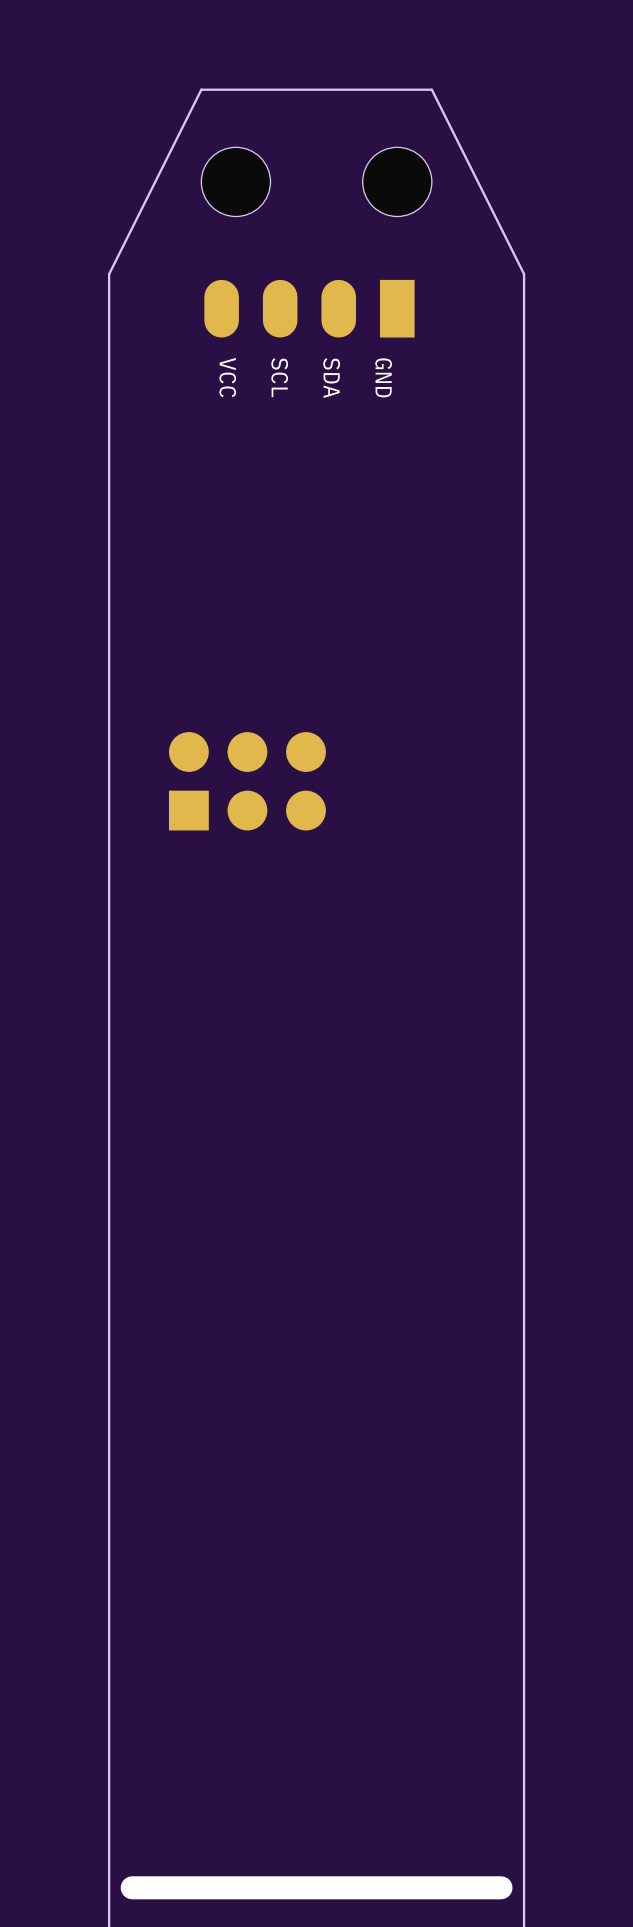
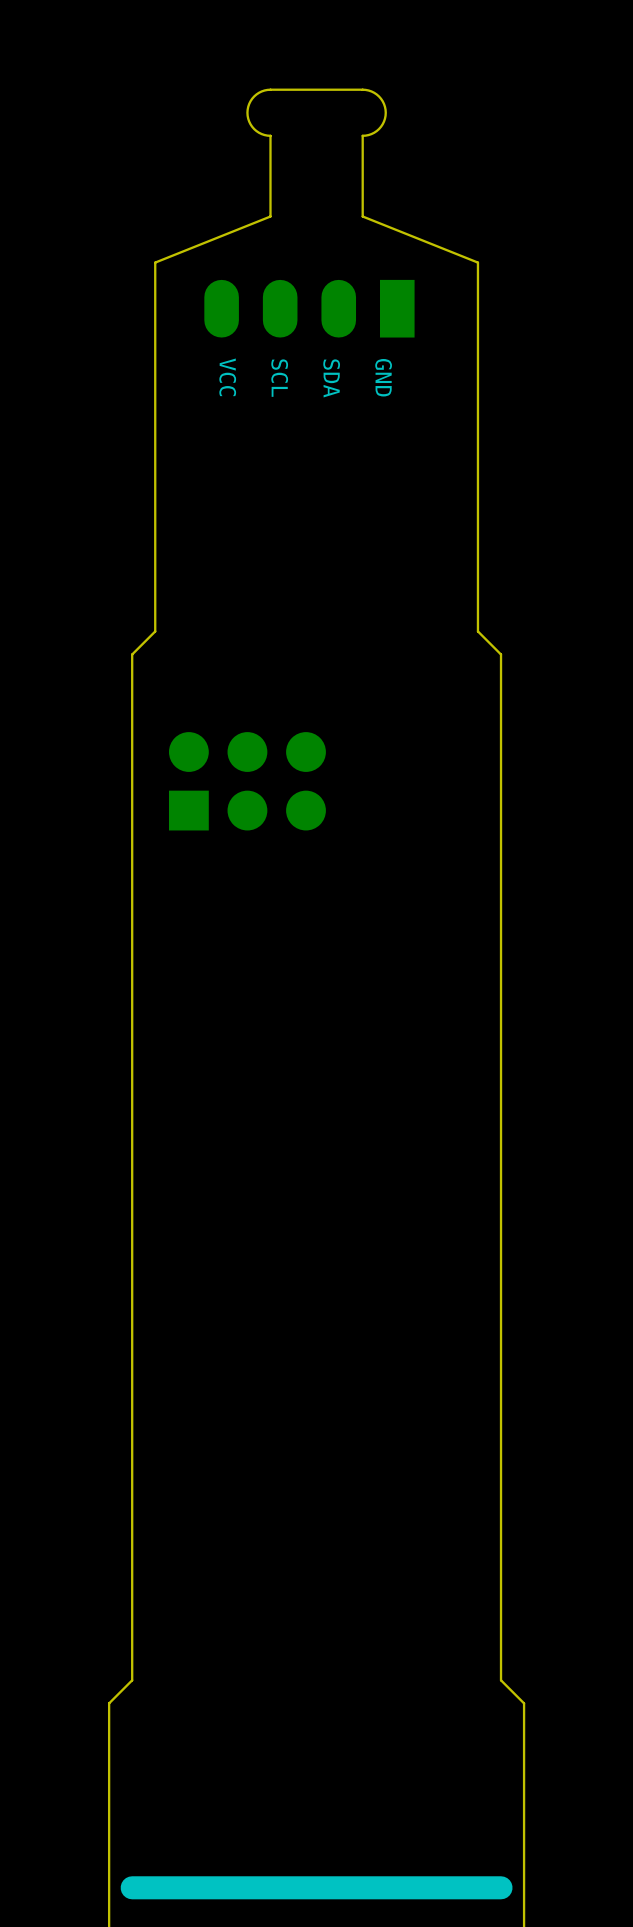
board edge: (270, 89) (201, 89) (109, 274) (109, 1703) -> (270, 89) (261, 91) (254, 96) (249, 103) (247, 112) (249, 121) (254, 129) (261, 134) (270, 135) (270, 216) (155, 262) (155, 631) (132, 654) (132, 1680) (109, 1703)
board edge: (362, 89) (431, 89) (524, 274) (524, 1703) -> (362, 89) (371, 91) (379, 96) (384, 103) (385, 112) (384, 121) (379, 129) (371, 134) (362, 135) (362, 216) (477, 262) (477, 631) (501, 654) (501, 1680) (524, 1703)
part: (235, 181) -> none
part: (397, 181) -> none

